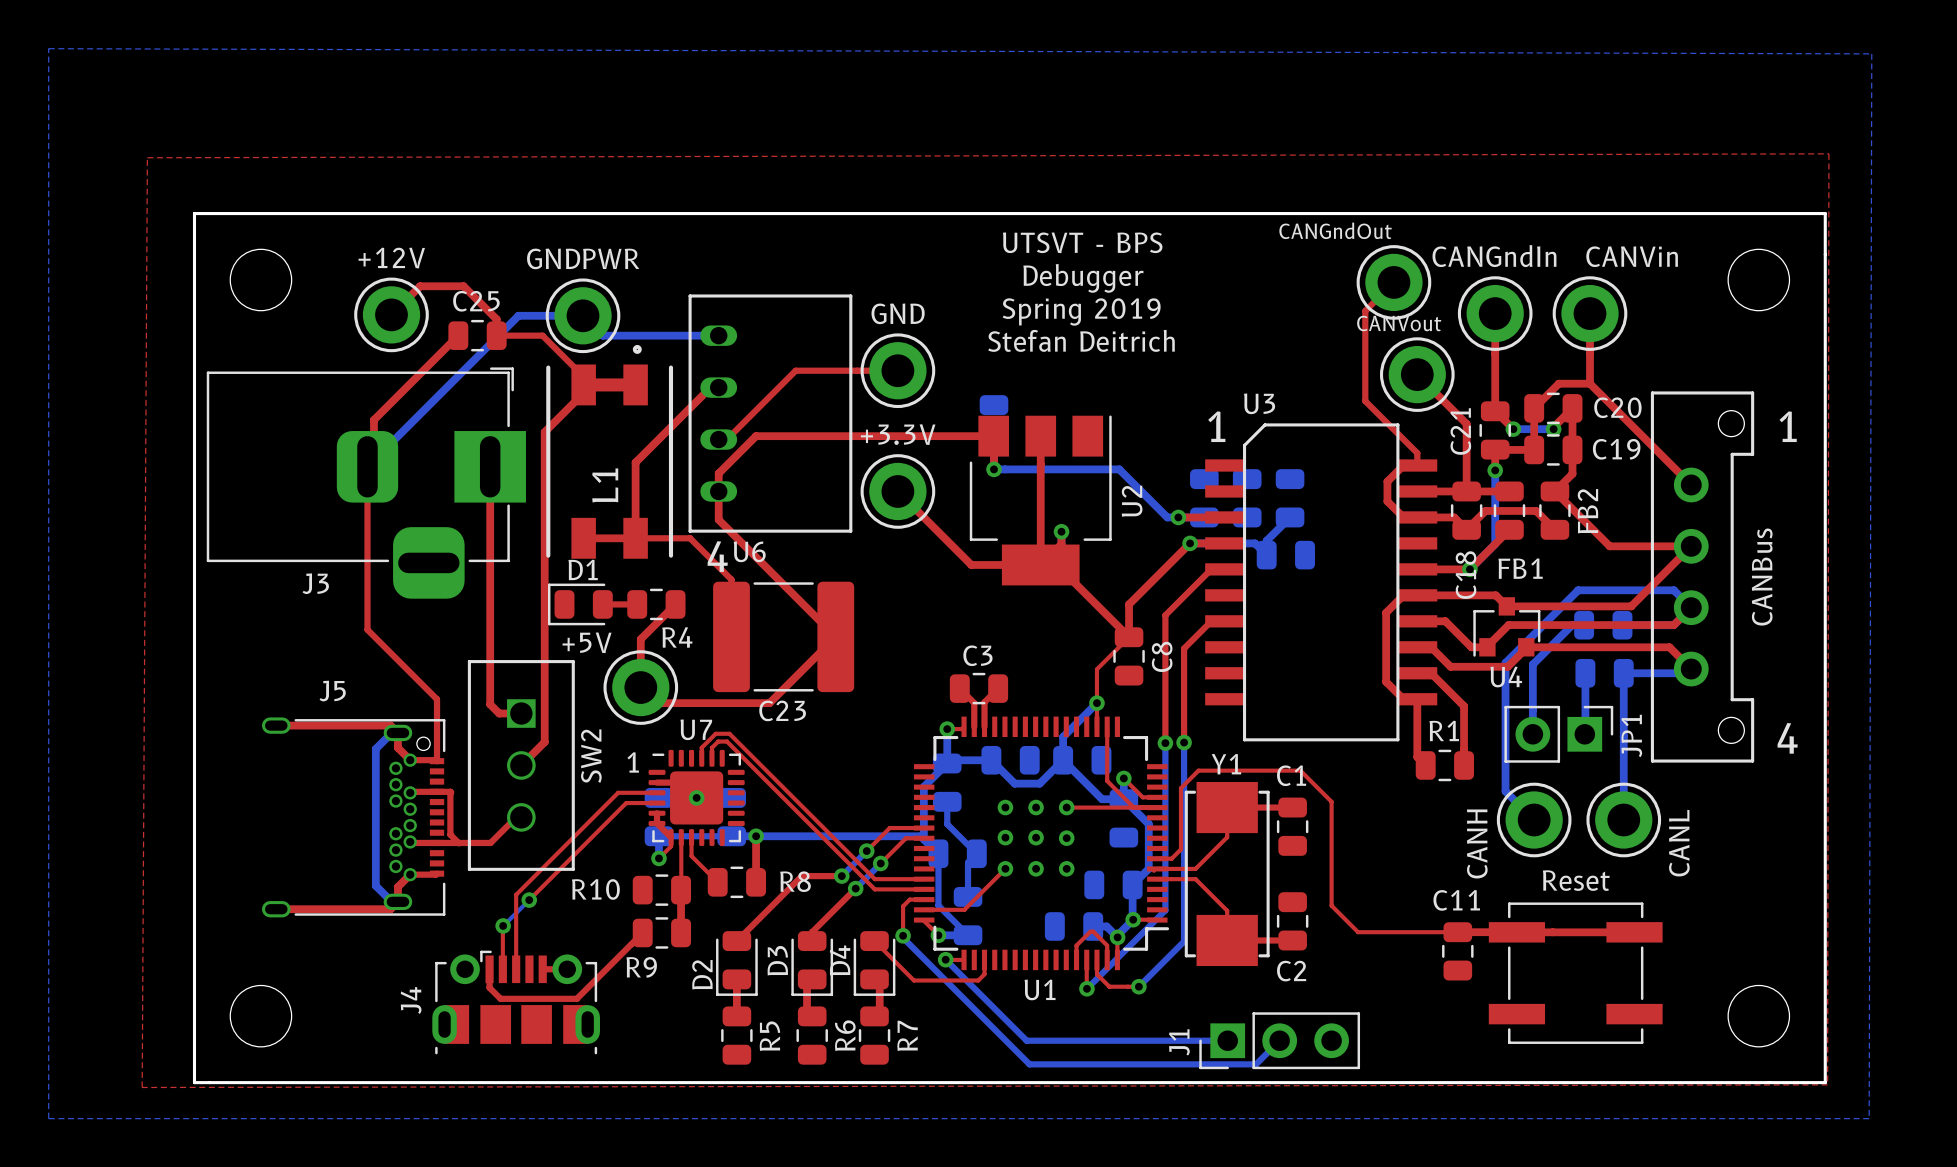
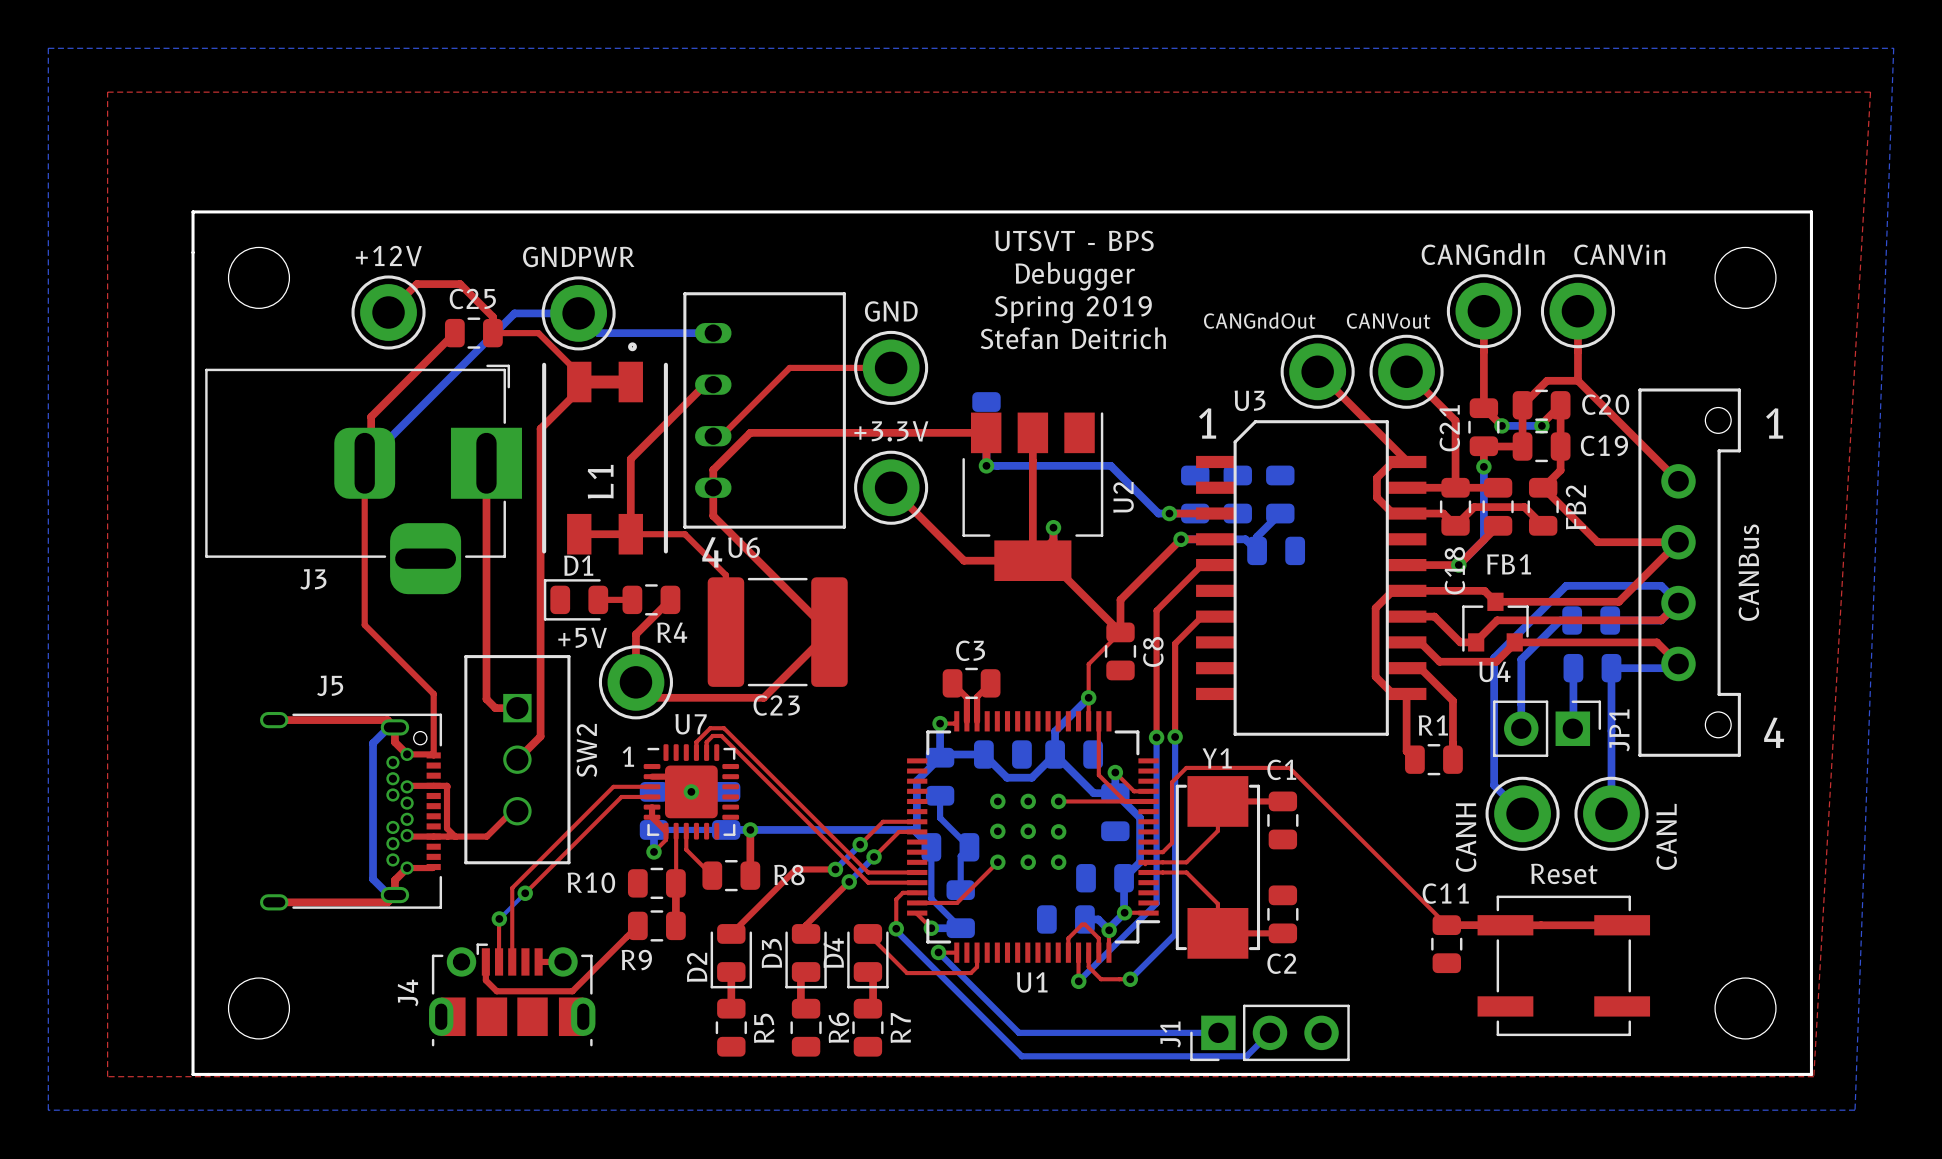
bottom zone outline: (48, 48) (1871, 53) (1869, 1118) -> (48, 48) (1893, 48) (1855, 1110)
top zone outline: (1828, 153) (147, 157) (142, 1087) (1827, 1084) (1828, 153) -> (107, 92) (107, 1076) (1813, 1076) (1870, 92) (107, 92)
top track: (1393, 282) (1365, 311) (1365, 401) (1417, 453) (1417, 465) -> none
CANGndOut position: (1393, 282) -> (1317, 371)
top track: none -> (1317, 371) (1406, 460)
top track: (1195, 773) (1198, 770) (1300, 770) (1331, 801) (1331, 905) (1358, 932) (1457, 932) -> (1186, 767) (1289, 767) (1446, 925)

